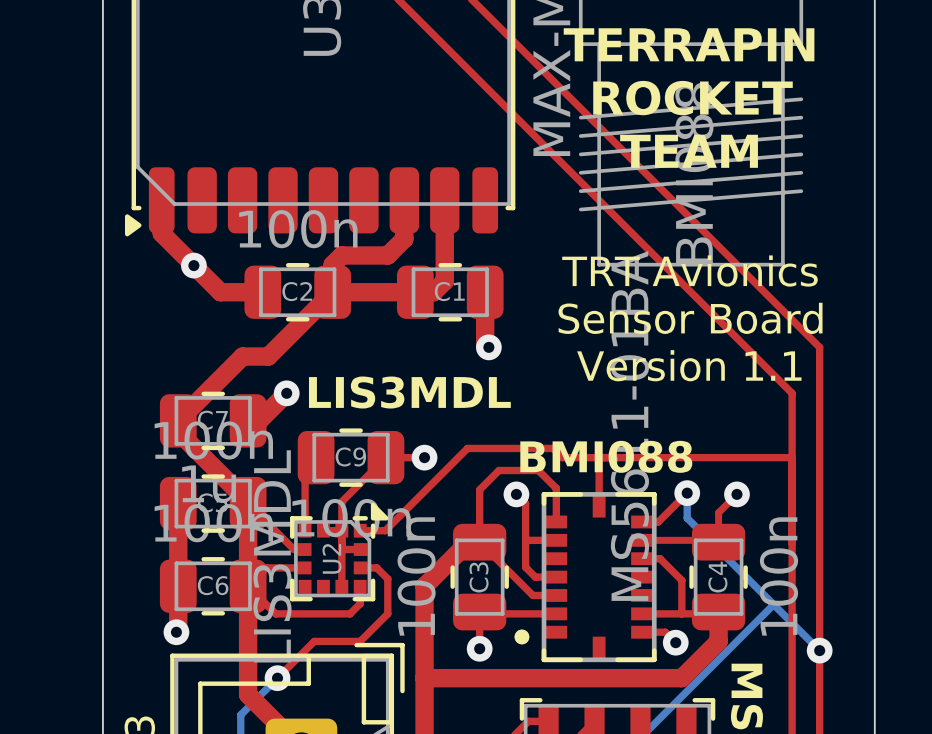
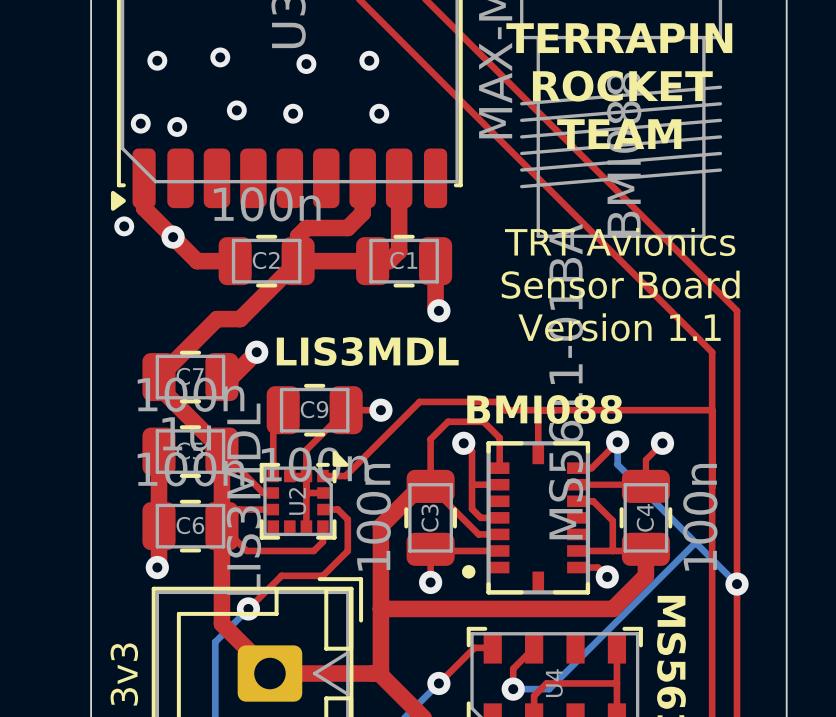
via: none -> (220, 57)
via: none -> (157, 60)
via: none -> (369, 60)
via: none -> (306, 64)
via: none -> (236, 110)
via: none -> (293, 113)
via: none -> (379, 113)
via: none -> (140, 123)
via: none -> (177, 126)
via: none -> (124, 226)

